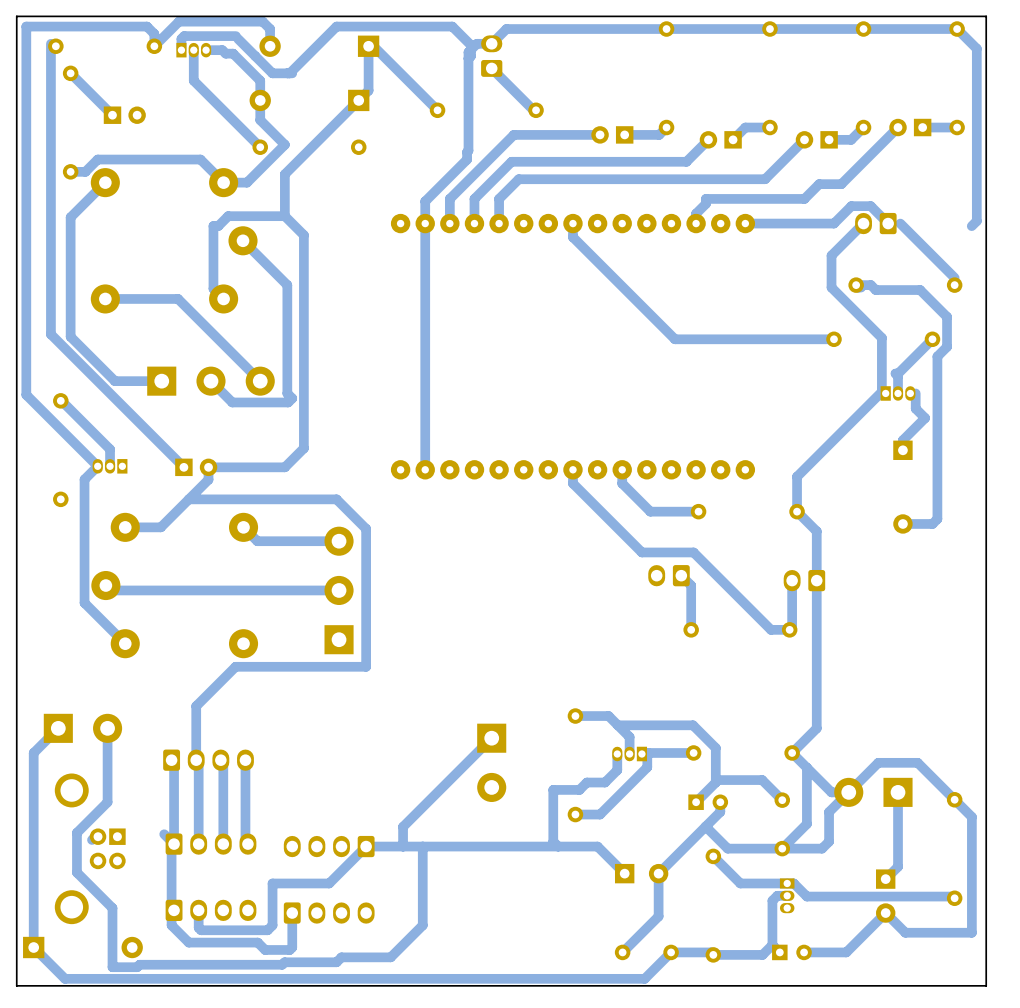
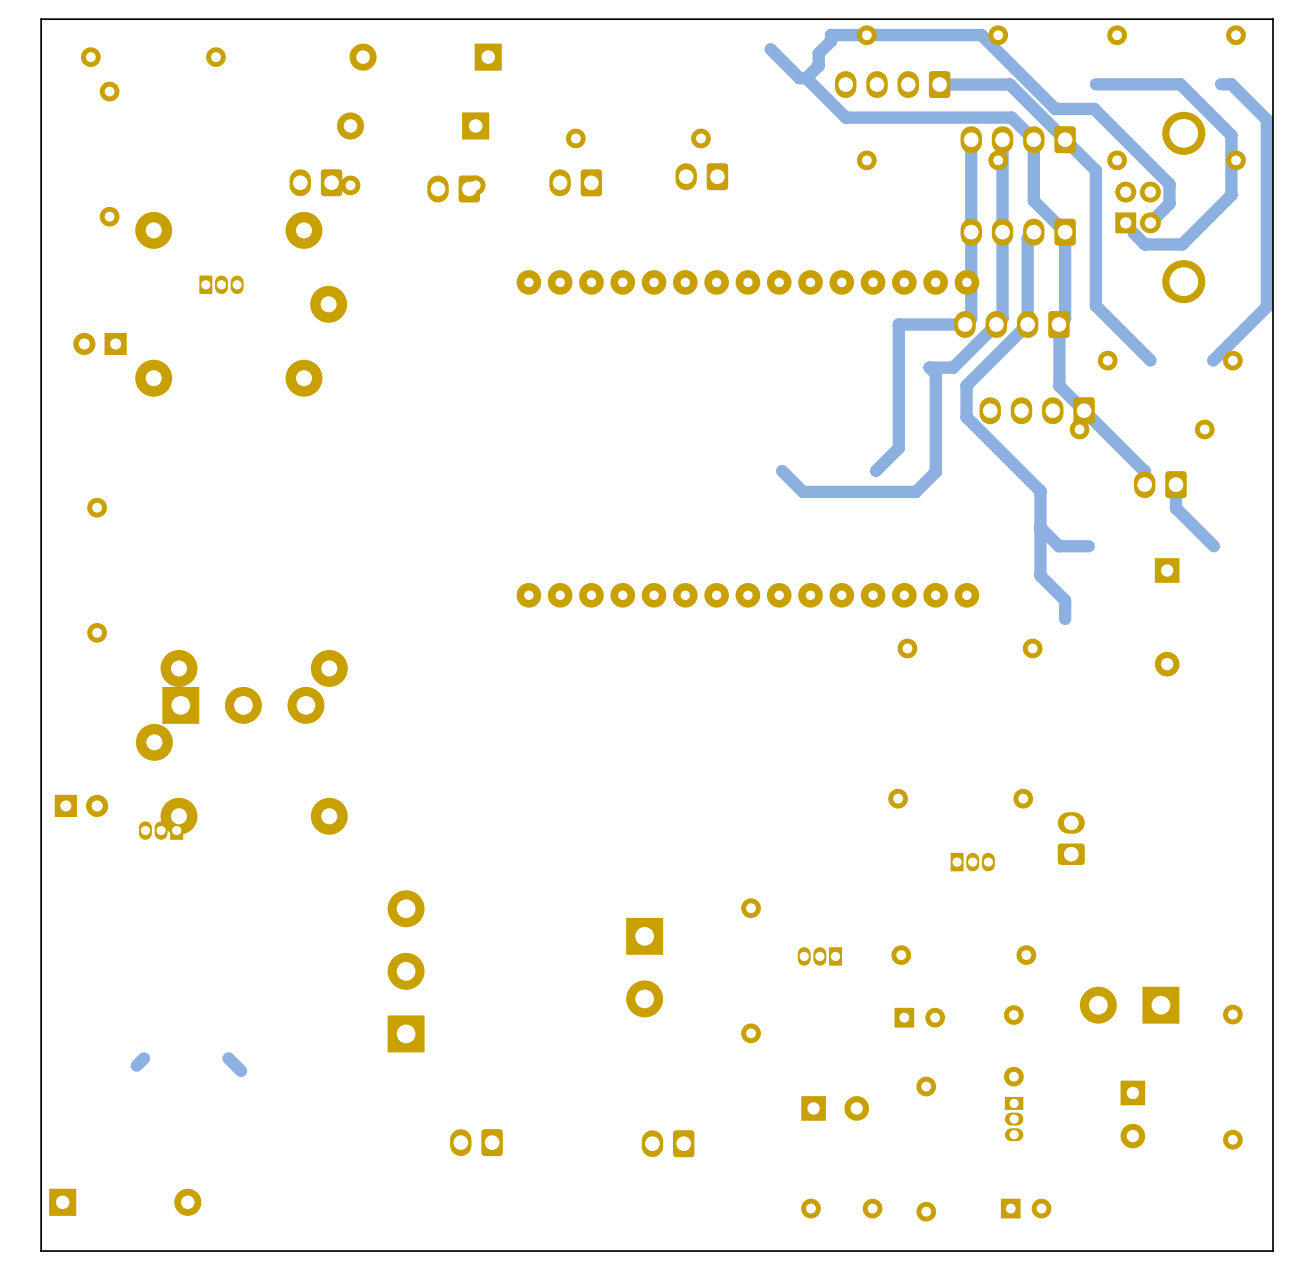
track: (235, 36) (184, 36) (181, 38) (181, 50) -> none
track: (238, 38) (272, 73) (292, 73) -> none
track: none -> (770, 49) (799, 78) (806, 78)
track: (50, 43) (50, 334) (183, 467) -> none
track: (270, 46) (270, 29) (262, 21) (178, 21) (154, 46) (154, 33) (146, 26) (26, 26) (26, 394) (97, 466) (84, 479) (84, 602) (125, 643) -> none
track: (193, 50) (193, 80) (260, 147) -> none
part: (193, 50) -> none
track: (211, 50) (222, 50) (225, 53) (233, 53) (260, 80) (260, 120) (284, 144) (247, 182) (223, 182) (200, 159) (97, 159) (85, 171) (70, 171) -> none
part: (491, 56) -> none
track: (468, 58) (470, 56) (470, 45) (452, 26) (336, 26) (289, 73) -> none
track: none -> (806, 78) (818, 65) (818, 53) (831, 41) (831, 35) (981, 35) (1055, 108) (1094, 108) (1169, 184) (1169, 203) (1150, 222)
track: none -> (806, 78) (845, 117) (1011, 117) (1033, 139)
part: none -> (892, 84)
track: none -> (939, 84) (1009, 84) (1095, 170) (1095, 305) (1150, 360)
track: none -> (1095, 84) (1180, 84) (1231, 135) (1231, 195) (1182, 244) (1144, 244) (1133, 233)
track: none -> (1221, 84) (1231, 84) (1266, 119) (1266, 306) (1213, 360)
track: (491, 68) (533, 110) (536, 110) -> none
track: (70, 73) (112, 115) -> none
track: none -> (1033, 136) (1033, 200) (1065, 232) (1065, 318) (1058, 324) (1059, 386) (1144, 471) (1144, 484)
track: (437, 110) (373, 46) (368, 46) (368, 90) (284, 174) (284, 216) -> none
track: none -> (971, 139) (971, 318) (965, 324) (898, 324) (898, 448) (875, 470)
track: none -> (1002, 139) (1002, 318) (953, 367) (929, 367) (935, 373) (935, 472) (915, 491) (803, 491) (782, 470)
part: none -> (1018, 139)
part: (124, 115) -> none
track: (666, 127) (659, 134) (624, 134) -> none
track: (769, 127) (745, 127) (733, 139) -> none
track: (863, 127) (851, 139) (829, 139) -> none
track: (898, 127) (841, 184) (819, 184) (804, 198) (705, 198) (705, 203) (696, 213) (696, 223) -> none
part: (910, 127) -> none
track: (957, 127) (922, 127) -> none
track: (600, 134) (513, 134) (449, 198) (449, 223) -> none
part: (612, 134) -> none
track: (708, 139) (686, 161) (511, 161) (474, 198) (474, 223) -> none
part: (720, 139) -> none
track: (804, 139) (765, 179) (518, 179) (499, 198) (499, 223) -> none
part: (816, 139) -> none
part: none -> (701, 176)
part: none -> (315, 182)
part: none -> (575, 182)
part: none -> (453, 189)
part: none -> (1160, 207)
track: (105, 182) (70, 217) (70, 336) (114, 381) (161, 381) -> none
part: none -> (1018, 232)
track: none -> (1033, 232) (1027, 238) (1027, 324) (966, 385) (966, 417) (1040, 491) (1040, 575) (1065, 600) (1065, 618)
track: (284, 216) (228, 216) (218, 226) (213, 226) (213, 288) (223, 298) -> none
track: (284, 216) (303, 235) (303, 448) (284, 467) (208, 467) (208, 479) (160, 527) (125, 527) -> none
track: (572, 223) (572, 237) (674, 339) (833, 339) -> none
track: (863, 223) (831, 255) (831, 287) (881, 337) (881, 389) (885, 393) -> none
part: (875, 223) -> none
track: (888, 223) (870, 206) (851, 206) (833, 223) (745, 223) -> none
track: (900, 223) (954, 277) -> none
part: none -> (221, 284)
track: (971, 226) (976, 221) (976, 48) (957, 29) (506, 29) (491, 43) (476, 43) (468, 52) (467, 159) (425, 201) (425, 469) -> none
track: (243, 240) (287, 285) (287, 393) (292, 398) (288, 402) (232, 402) (210, 381) -> none
part: none -> (1012, 324)
part: none -> (99, 343)
track: (861, 287) (856, 285) (870, 285) (875, 290) (920, 290) (947, 316) (947, 346) (937, 356) (937, 519) (932, 523) (902, 523) -> none
track: (105, 298) (178, 298) (260, 381) -> none
part: none -> (1037, 410)
track: (932, 339) (898, 373) (895, 373) (898, 376) (898, 393) -> none
part: (210, 381) -> none
part: none -> (1160, 484)
track: none -> (1175, 484) (1175, 508) (1213, 546)
track: (880, 393) (797, 476) (797, 511) (816, 531) (816, 728) (792, 752) (831, 792) (848, 792) -> none
part: (898, 393) -> none
track: (915, 393) (915, 408) (925, 418) (902, 440) (902, 450) -> none
track: (61, 400) (110, 449) (110, 466) -> none
track: none -> (1040, 527) (1058, 546) (1088, 546)
part: (110, 466) -> none
part: (196, 467) -> none
track: (572, 469) (572, 483) (641, 552) (693, 552) (771, 629) (789, 629) (792, 627) (792, 580) -> none
track: (622, 469) (622, 483) (650, 511) (698, 511) -> none
track: (188, 499) (336, 499) (366, 528) (366, 666) (235, 666) (196, 706) (198, 844) -> none
track: (243, 527) (257, 541) (339, 541) -> none
part: none -> (243, 705)
part: (669, 575) -> none
track: (681, 575) (691, 585) (691, 629) -> none
part rotation: 0° (804, 580) -> 90° clockwise (1071, 838)
part position: (804, 580) -> (1071, 838)
track: (105, 585) (110, 590) (339, 590) -> none
part: (339, 590) -> none
part: none -> (81, 805)
part: none -> (161, 830)
part: none -> (972, 862)
track: (575, 716) (608, 716) (629, 737) (629, 754) -> none
track: (617, 725) (693, 725) (715, 748) (715, 782) (696, 802) -> none
track: (58, 728) (33, 752) (33, 952) -> none
part: (82, 728) -> none
track: (107, 728) (107, 802) (76, 832) (76, 872) (112, 908) (112, 967) (137, 967) (139, 964) (282, 964) (284, 962) (336, 962) (341, 957) (390, 957) (422, 925) (422, 846) -> none
track: (491, 738) (403, 826) (403, 846) -> none
track: (693, 752) (648, 752) (647, 767) (600, 814) (575, 814) -> none
track: (617, 754) (617, 770) (604, 782) (586, 782) (579, 789) (553, 789) (553, 841) (558, 846) -> none
track: (171, 760) (174, 762) (171, 925) (188, 942) (257, 942) (265, 949) (289, 949) (292, 947) (292, 913) -> none
part: (208, 760) -> none
track: (220, 760) (223, 762) (223, 844) -> none
track: (245, 760) (245, 841) (247, 844) -> none
part: none -> (406, 971)
track: (806, 767) (806, 824) (782, 848) -> none
track: (715, 780) (762, 780) (782, 800) -> none
track: (898, 792) (898, 866) (885, 879) -> none
track: (720, 802) (720, 811) (658, 873) (658, 916) (622, 952) -> none
track: (705, 826) (727, 848) (822, 848) (829, 841) (829, 812) (878, 762) (917, 762) (971, 817) (971, 932) (905, 932) (885, 913) (846, 952) (804, 952) -> none
part: (210, 844) -> none
part: (329, 846) -> none
part: (90, 848) -> none
track: (713, 856) (740, 883) (793, 883) (806, 896) (952, 896) (954, 898) -> none
track: (624, 873) (597, 846) (366, 846) (329, 883) (272, 883) (272, 925) (267, 930) (201, 930) (198, 927) (198, 910) -> none
track: (787, 895) (777, 895) (772, 900) (772, 945) -> none
part position: (787, 895) -> (1014, 1119)
part position: (885, 896) -> (1132, 1114)
part: none -> (476, 1142)
part: none -> (668, 1143)
part: (210, 910) -> none
part: (329, 913) -> none
track: (772, 945) (762, 954) (671, 952) (644, 978) (65, 978) (33, 947) -> none

